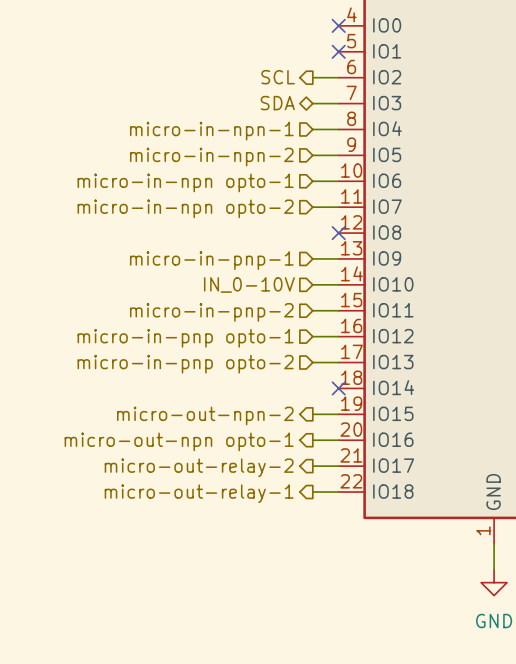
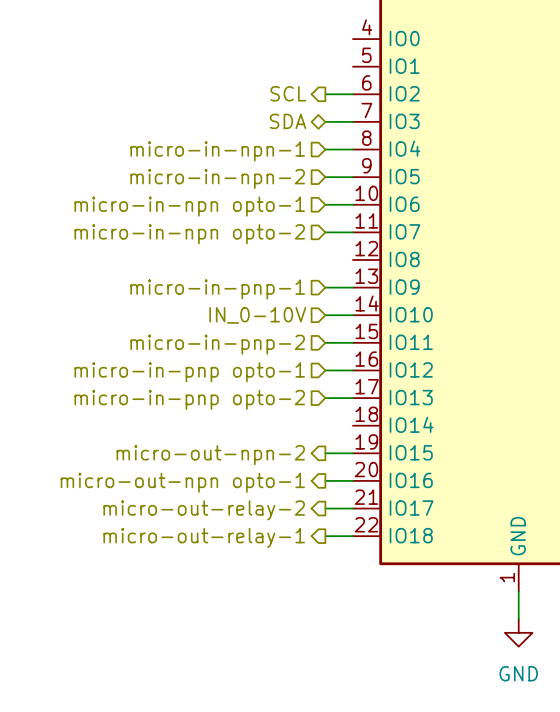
no-connect mark: (338, 25) -> none
no-connect mark: (338, 51) -> none
no-connect mark: (338, 233) -> none
no-connect mark: (338, 388) -> none

